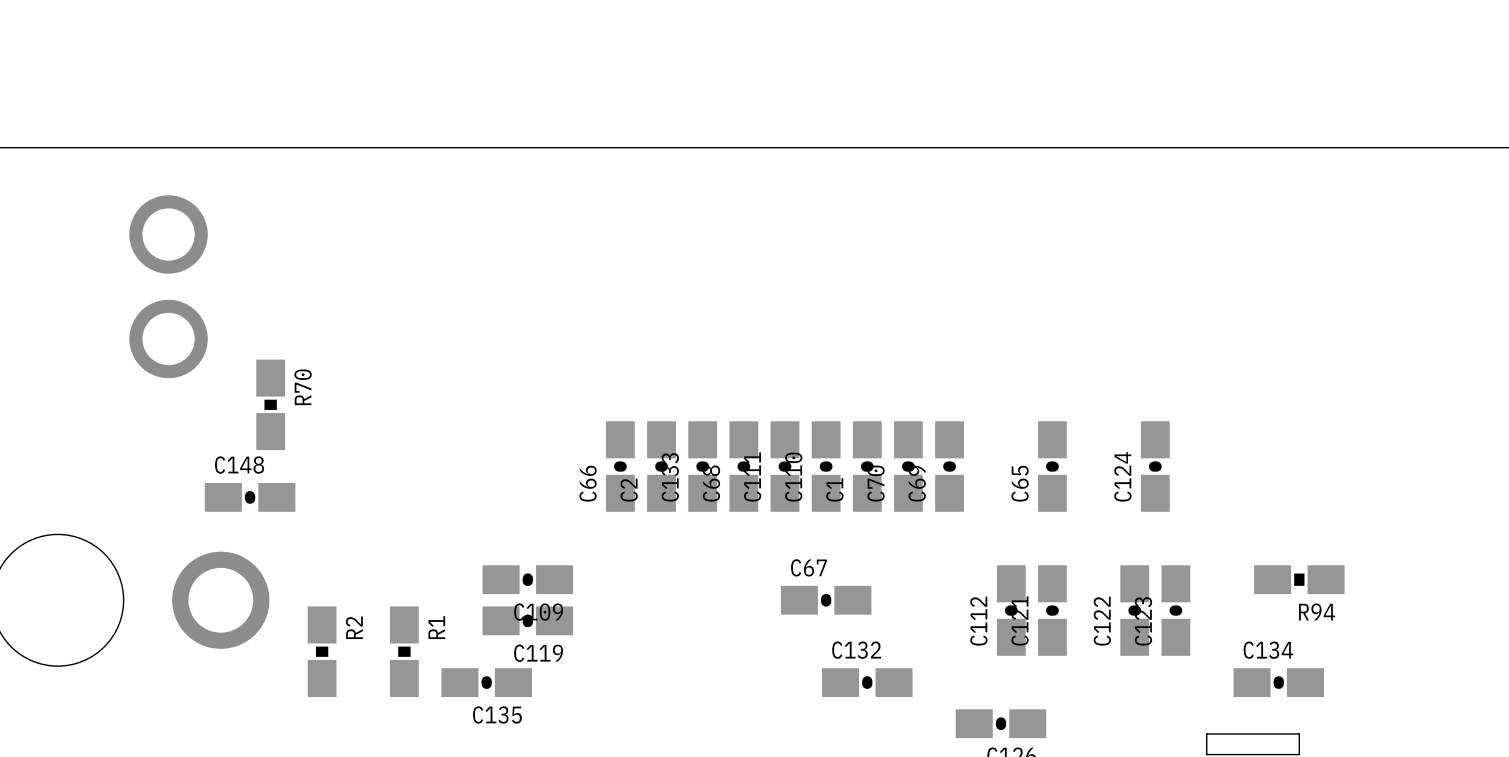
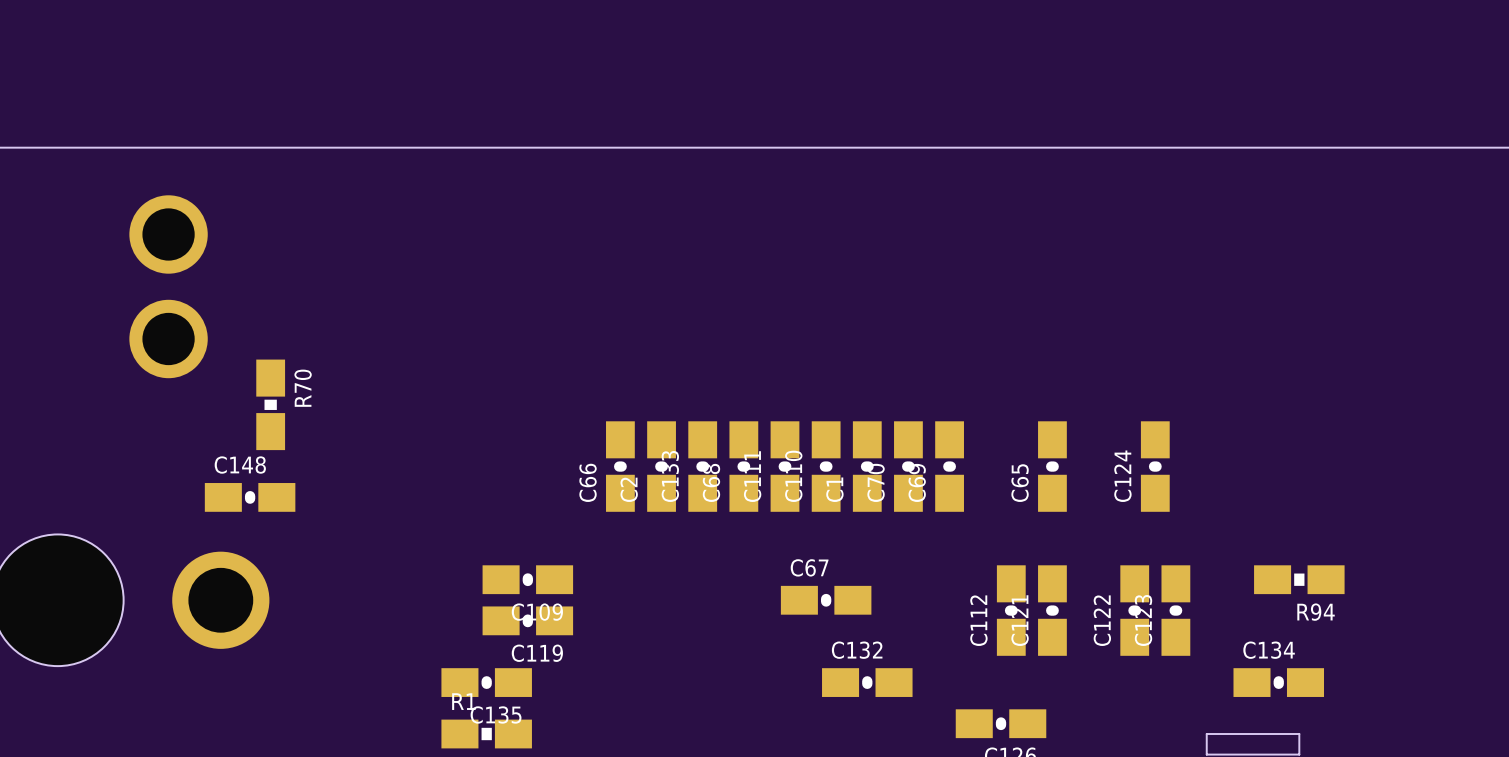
R2: (322, 651) -> none
R1 rotation: 0° (404, 651) -> 90° clockwise (486, 734)
R1 position: (404, 651) -> (486, 734)

